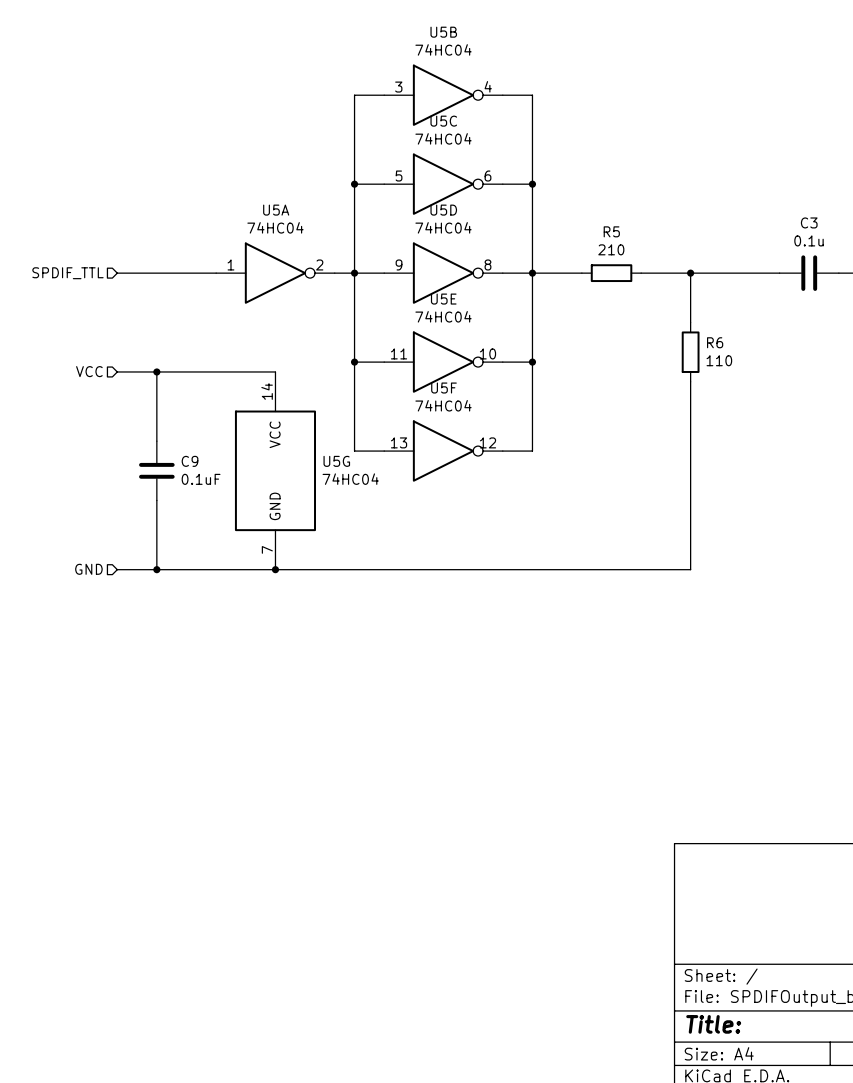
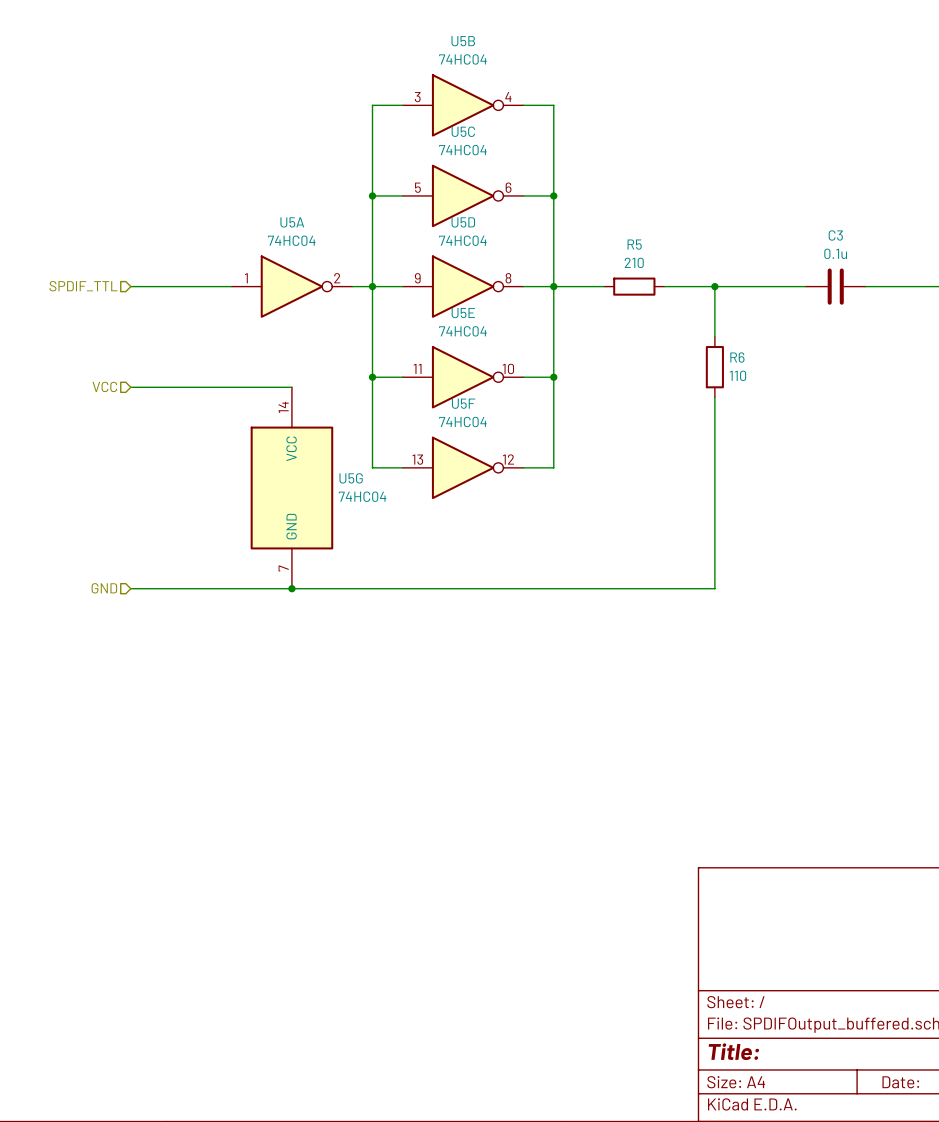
wire: (156, 371) (156, 441) -> none
junction: (156, 371) -> none
C9: 0.1uF (156, 470) -> none
wire: (156, 500) (156, 569) -> none
junction: (156, 569) -> none

